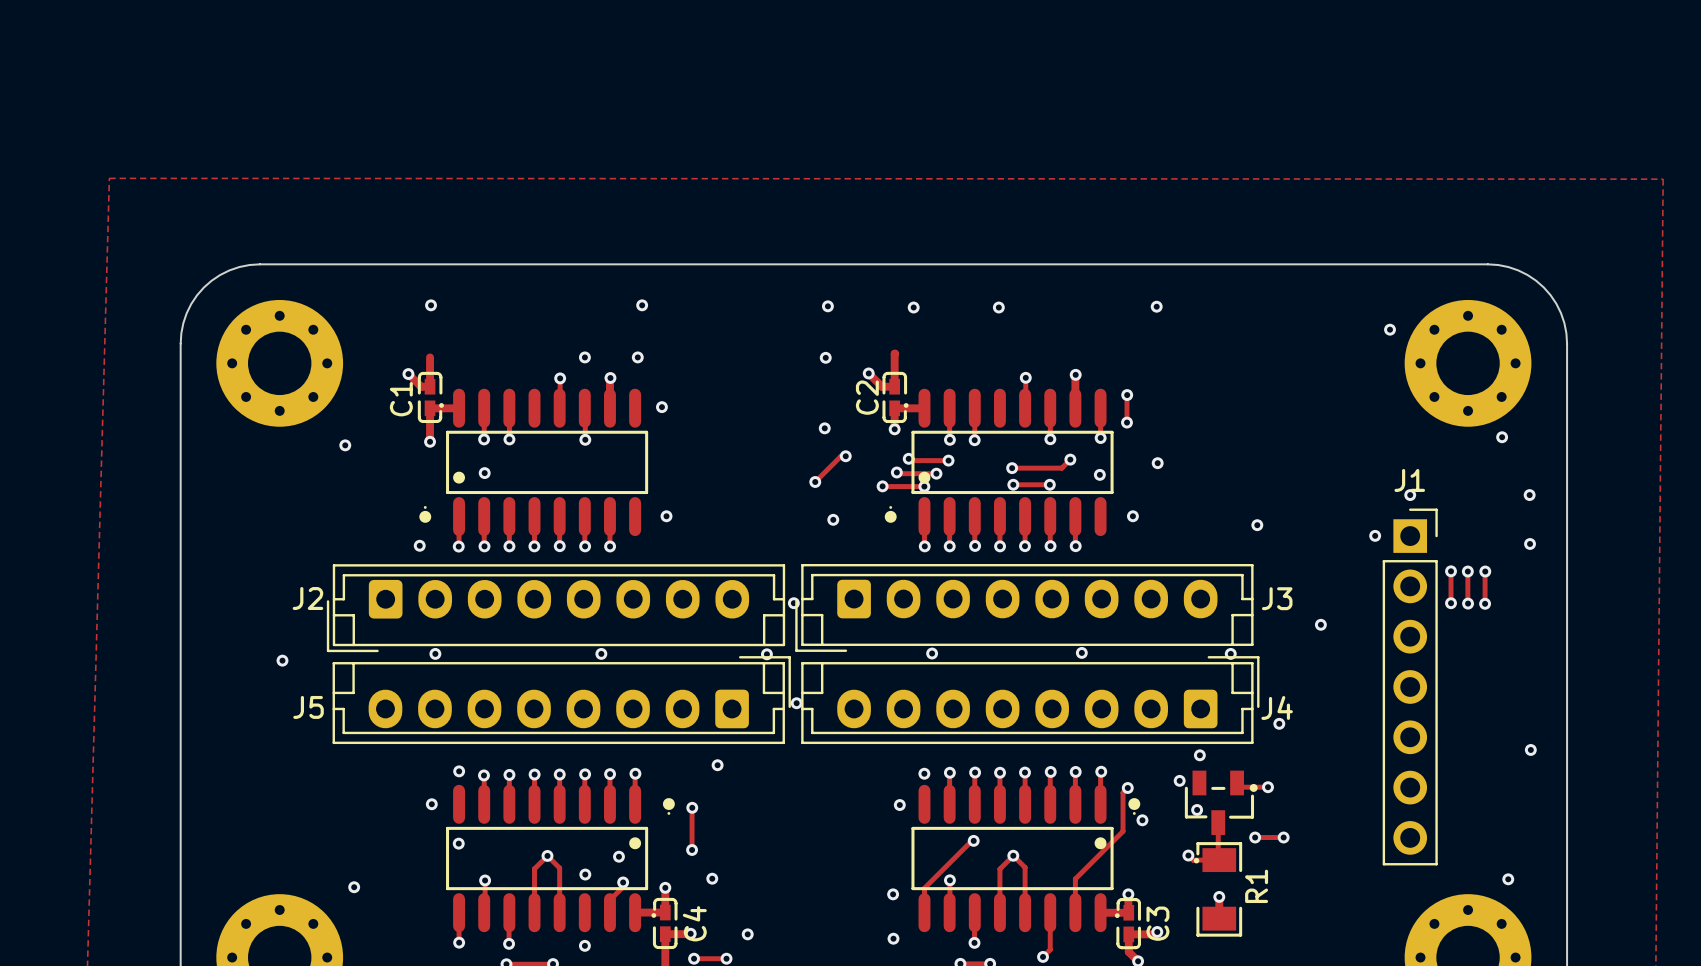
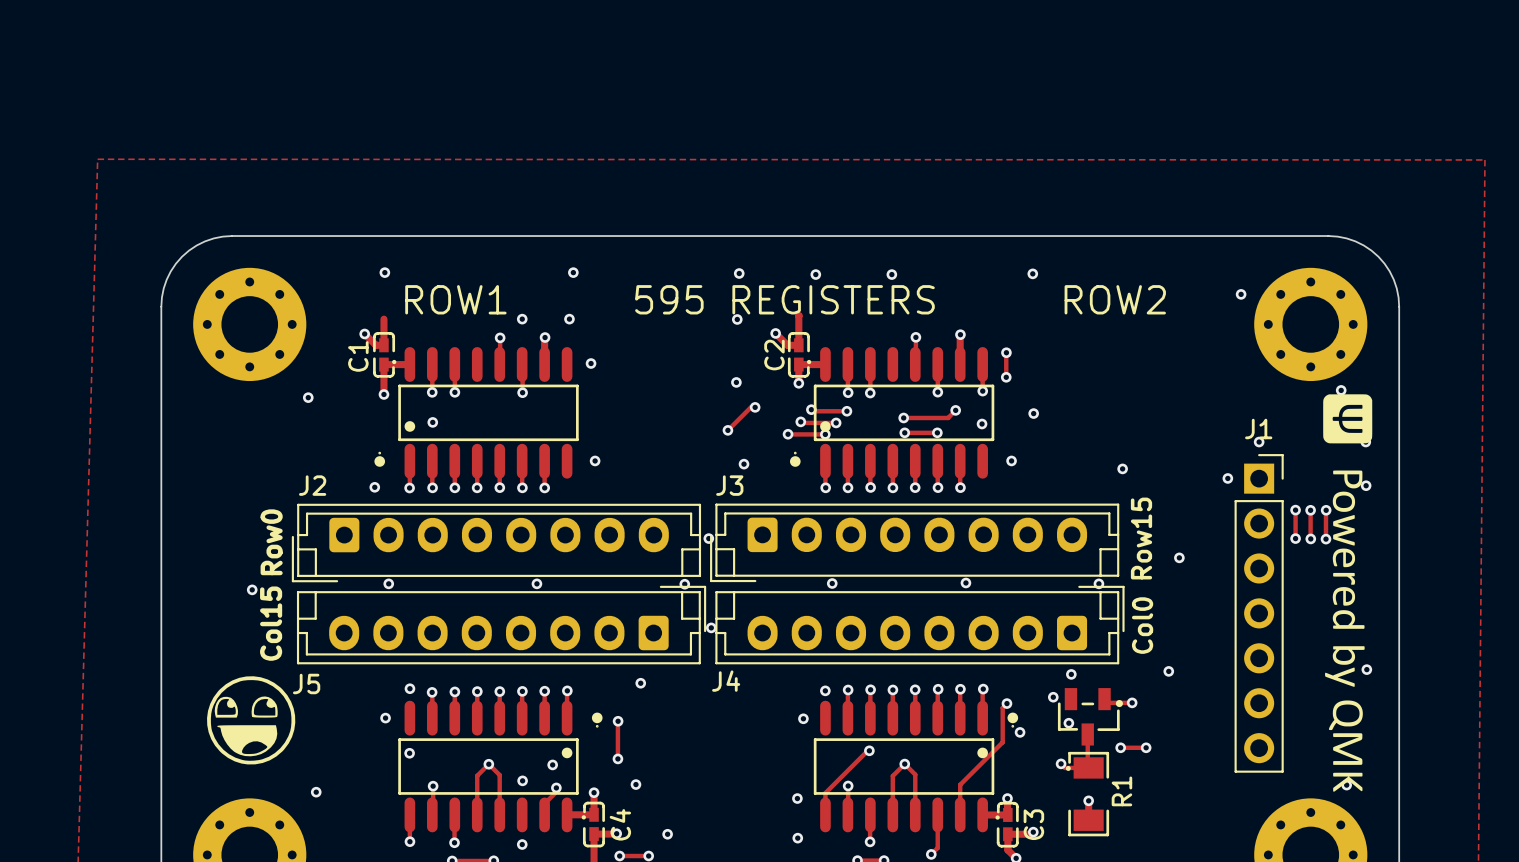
text: none -> ROW1 595 REGISTERS ROW2 (785, 299)
drawing: none -> [1323, 394, 1373, 792]
J2 name position: J2 (307, 598) -> J2 (312, 485)
J3 name position: J3 (1277, 598) -> J3 (729, 485)
text: none -> Row15 (1141, 538)
text: none -> Row0 (271, 542)
text: none -> Col15 (271, 623)
text: none -> Col0 (1142, 625)
J5 name position: J5 (308, 707) -> J5 (306, 683)
J4 name position: J4 (1277, 707) -> J4 (726, 681)
via position: (1279, 723) -> (1168, 671)
drawing: none -> [207, 676, 296, 765]

